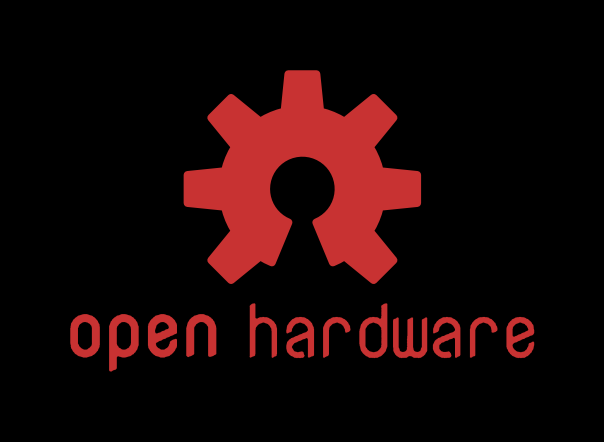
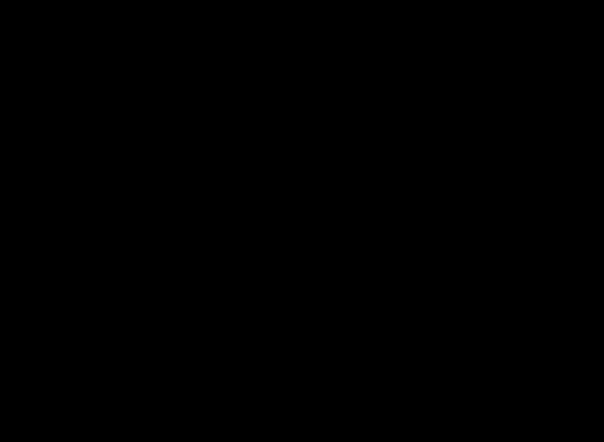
part: (302, 220) -> none

